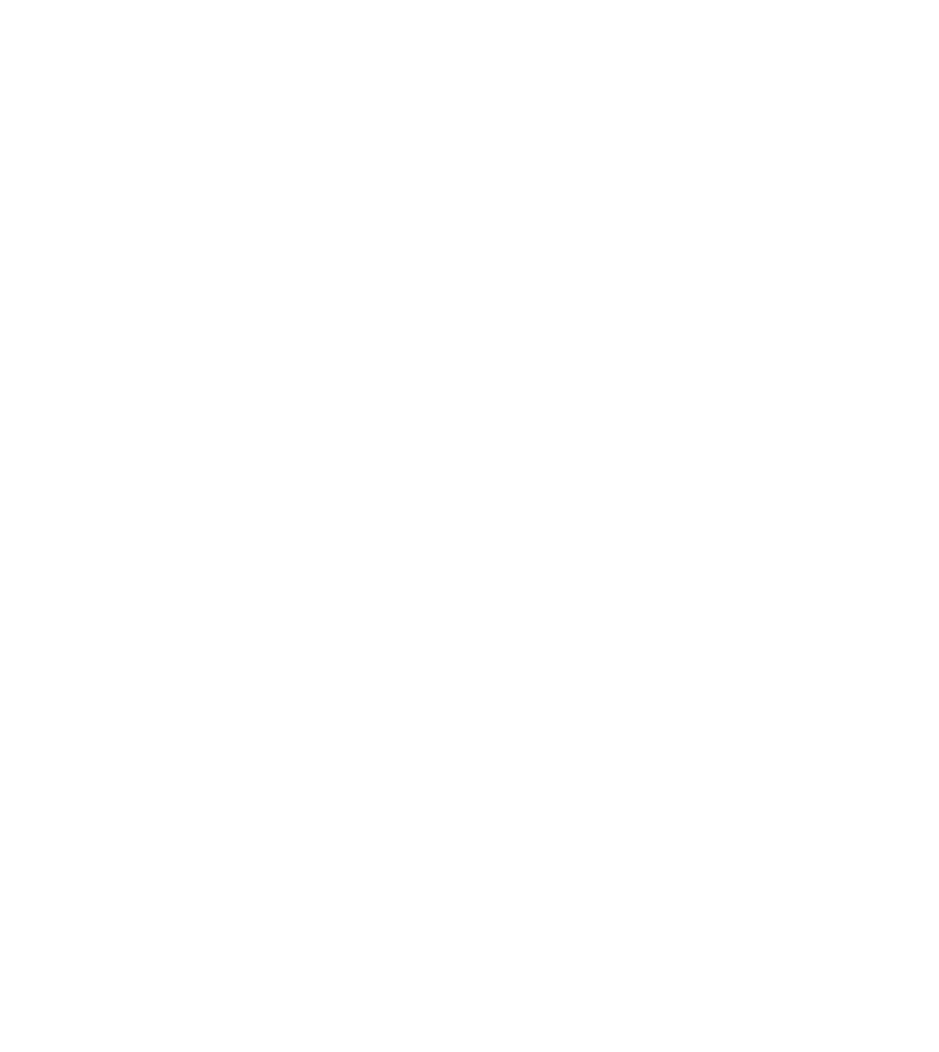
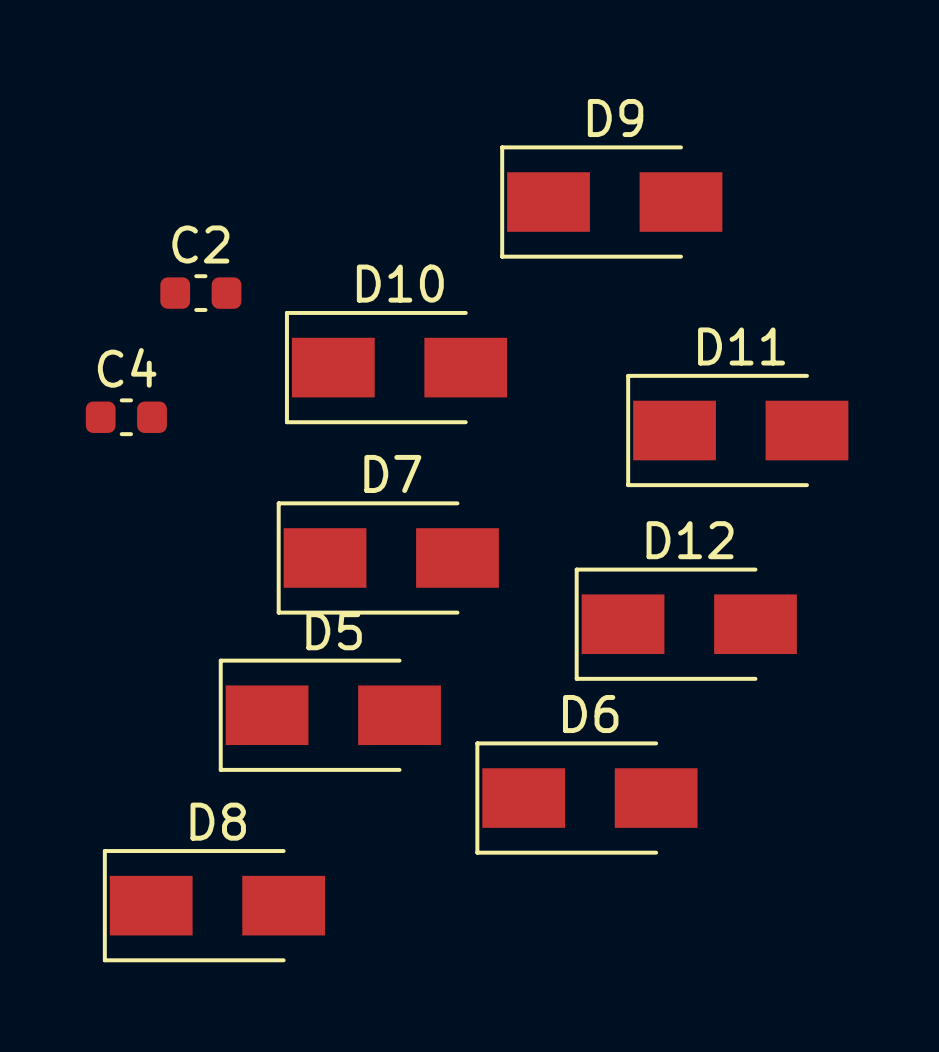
D9: none -> (611, 202)
C2: none -> (200, 293)
D10: none -> (396, 367)
C4: none -> (126, 417)
D11: none -> (737, 430)
D7: none -> (387, 557)
D12: none -> (685, 624)
D5: none -> (329, 715)
D6: none -> (586, 798)
D8: none -> (213, 905)

